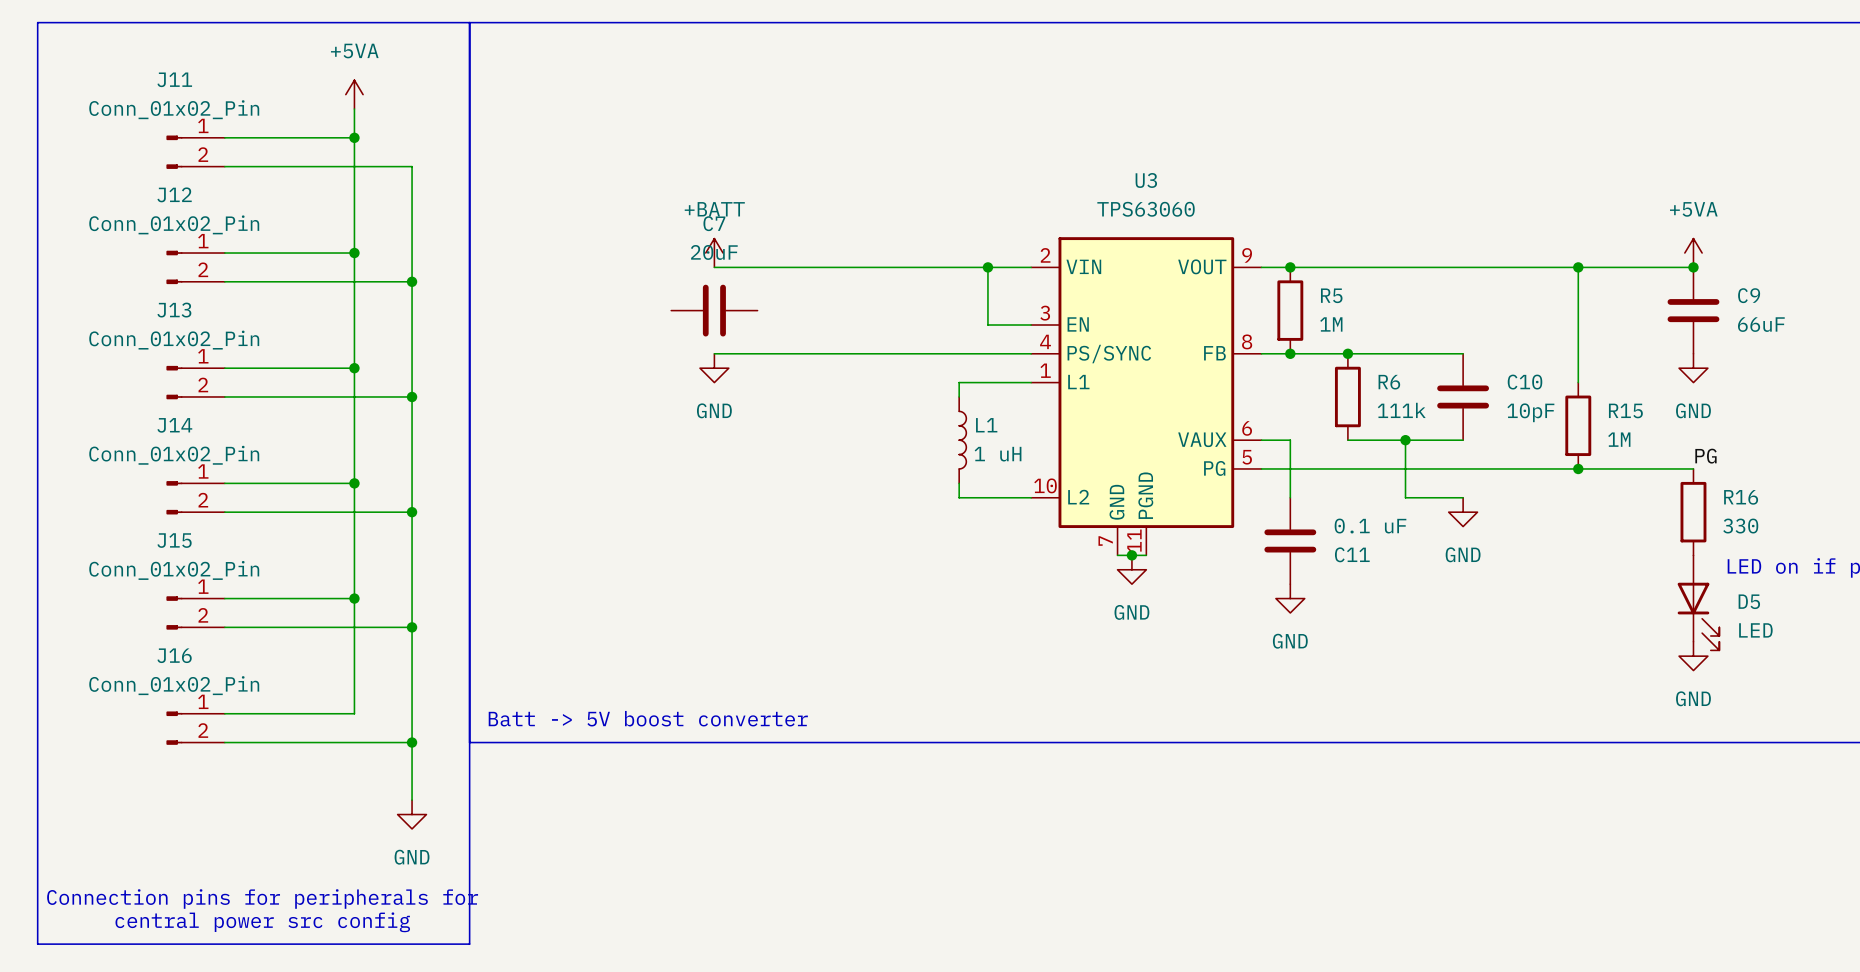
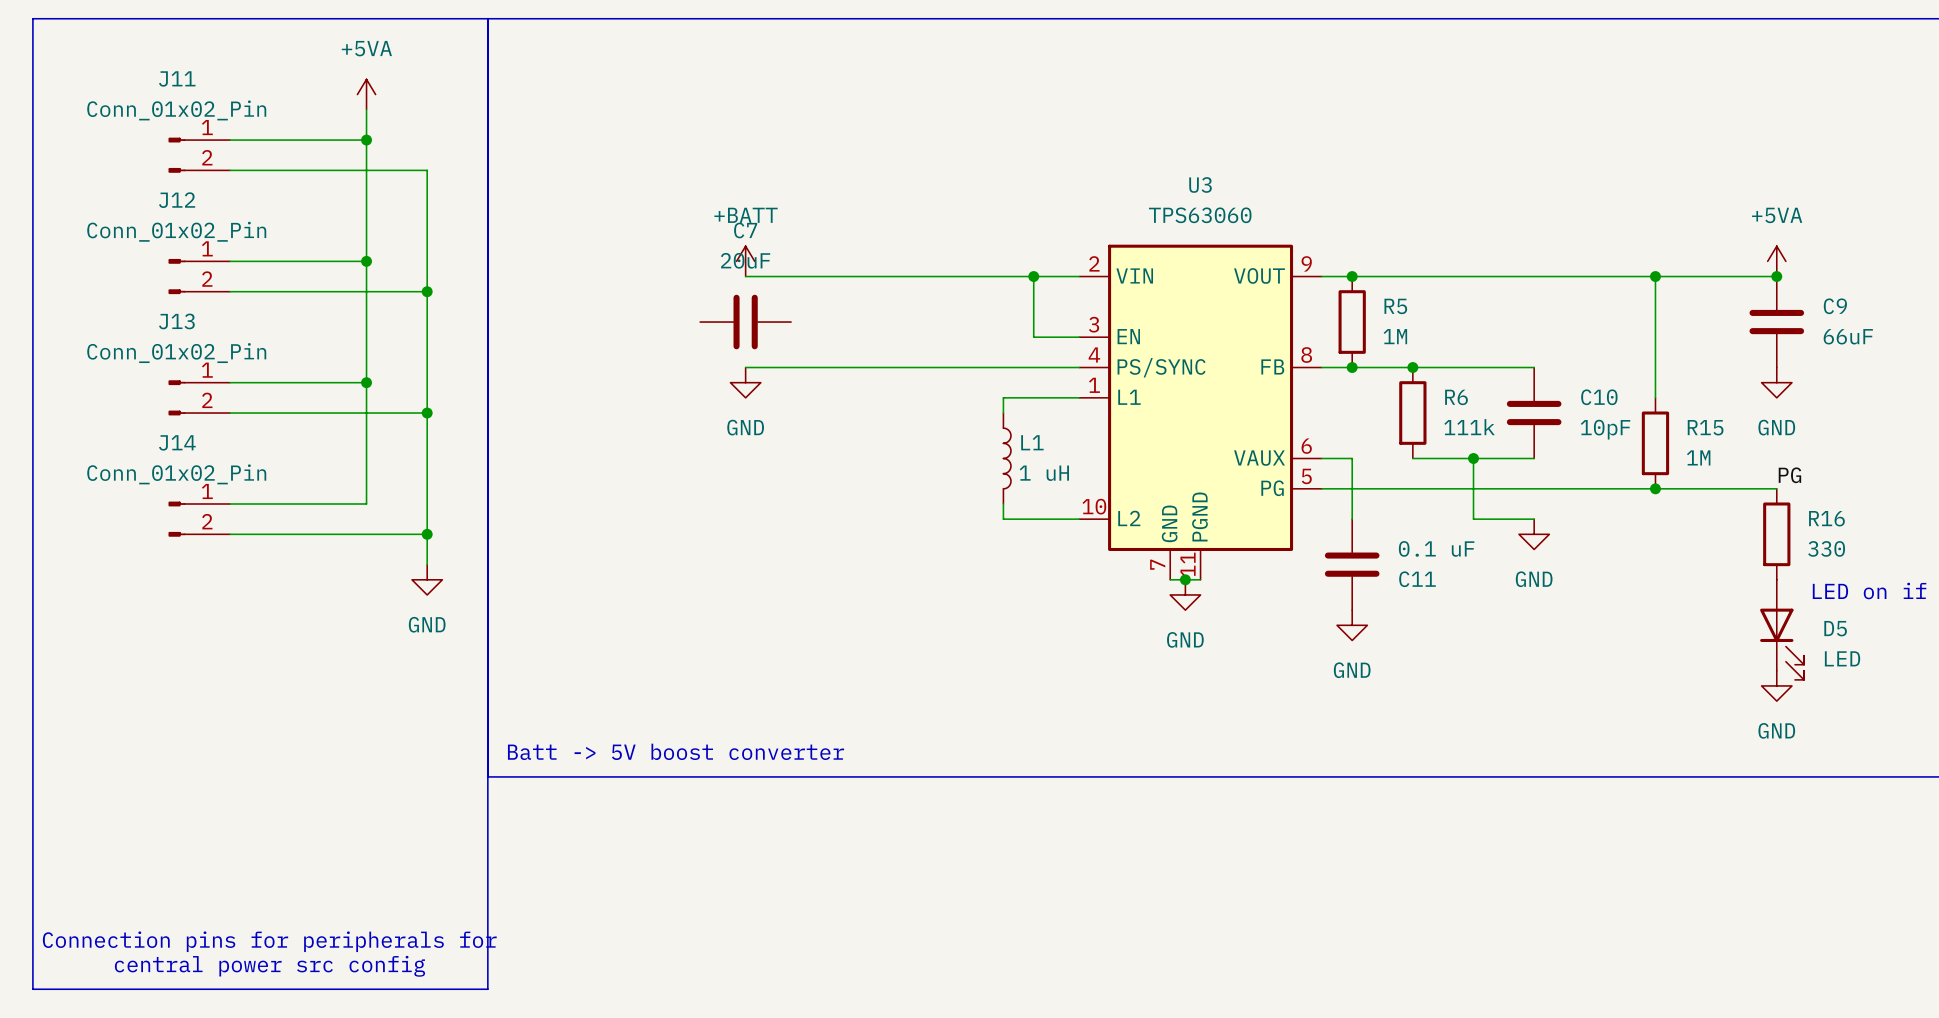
wire: (354, 483) (354, 713) (224, 713) -> none
junction: (354, 483) -> none
wire: (412, 540) (412, 800) -> none
wire: (224, 598) (354, 598) -> none
junction: (354, 598) -> none
J15: Conn_01x02_Pin (195, 612) -> none
wire: (224, 627) (412, 627) -> none
junction: (412, 627) -> none
J16: Conn_01x02_Pin (195, 728) -> none
wire: (224, 742) (412, 742) -> none
junction: (412, 742) -> none
power symbol position: GND (412, 814) -> GND (427, 579)

